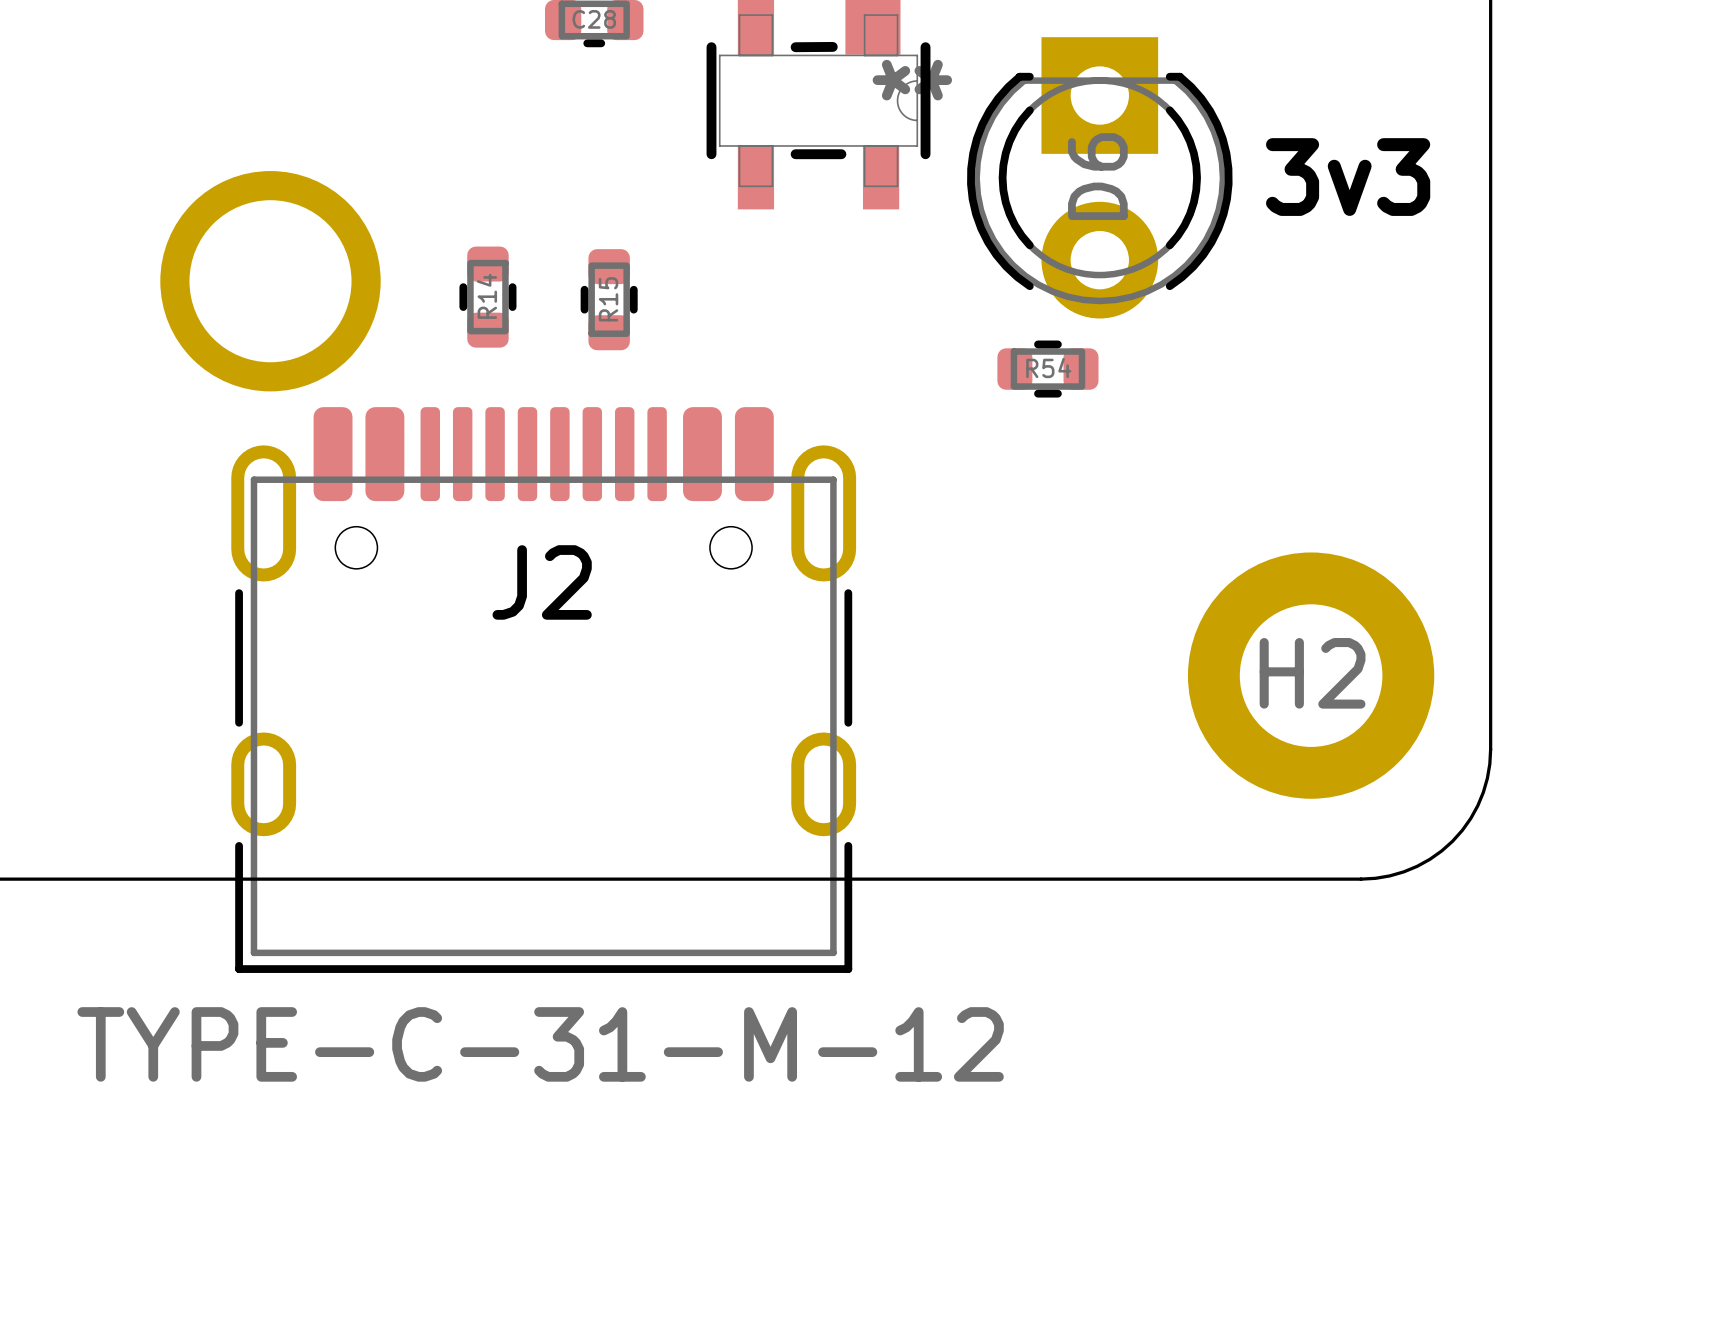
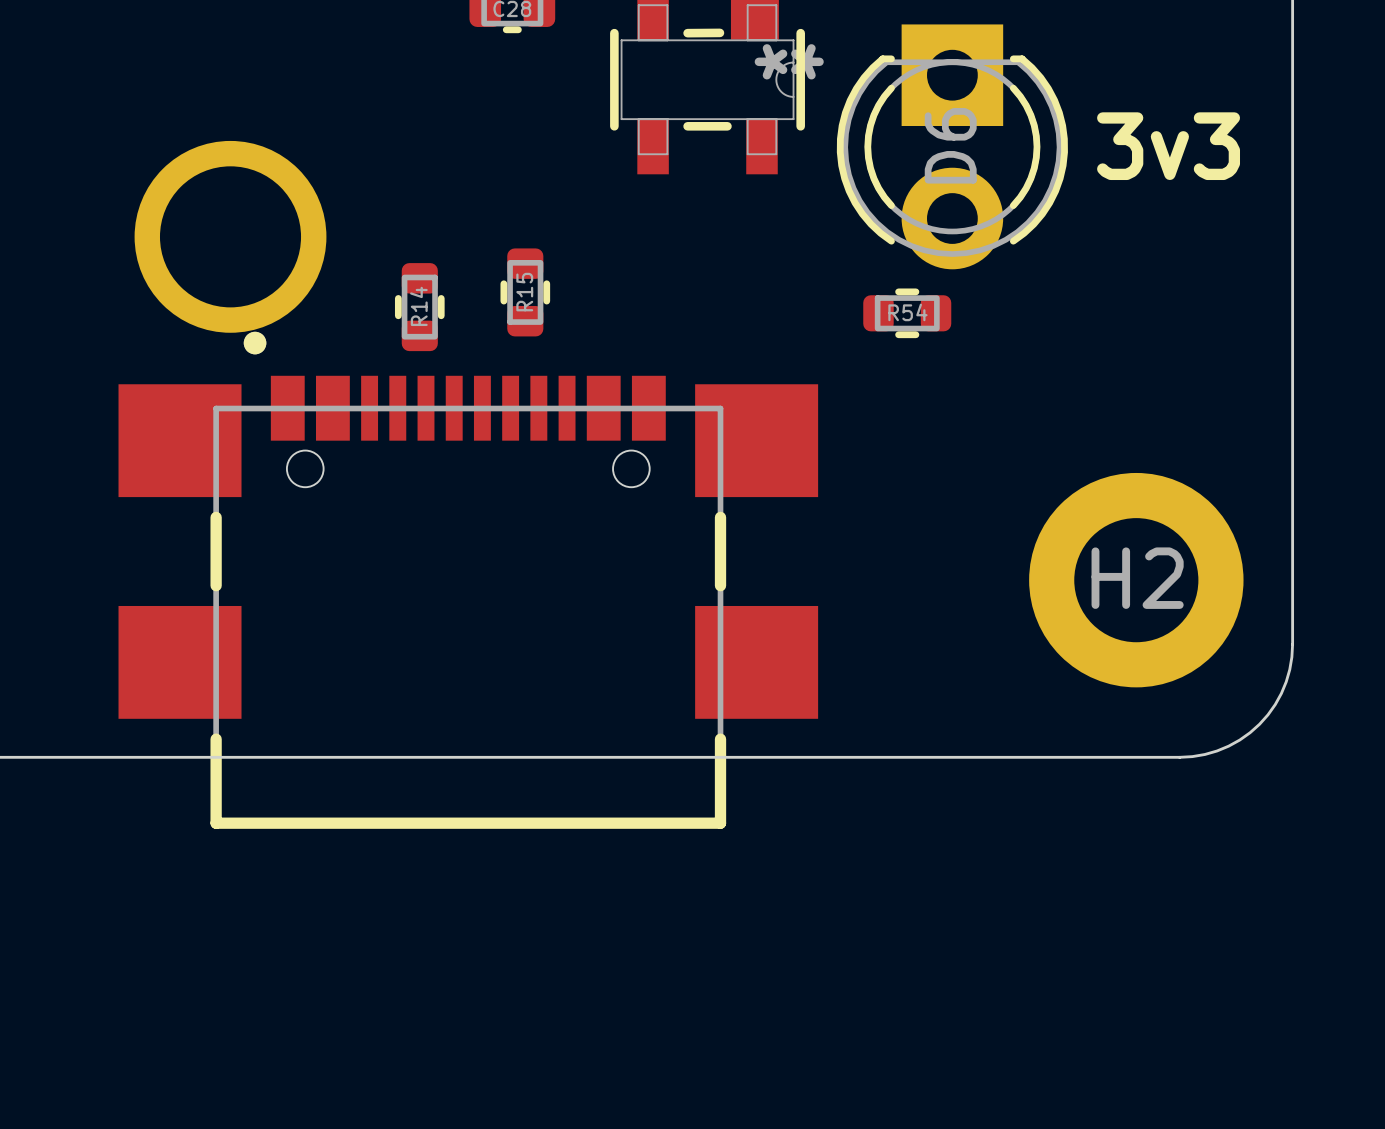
R14 position: (487, 297) -> (419, 307)
R15 position: (609, 299) -> (525, 292)
part: none -> (468, 580)
J2: TYPE-C-31-M-12 (543, 690) -> none

